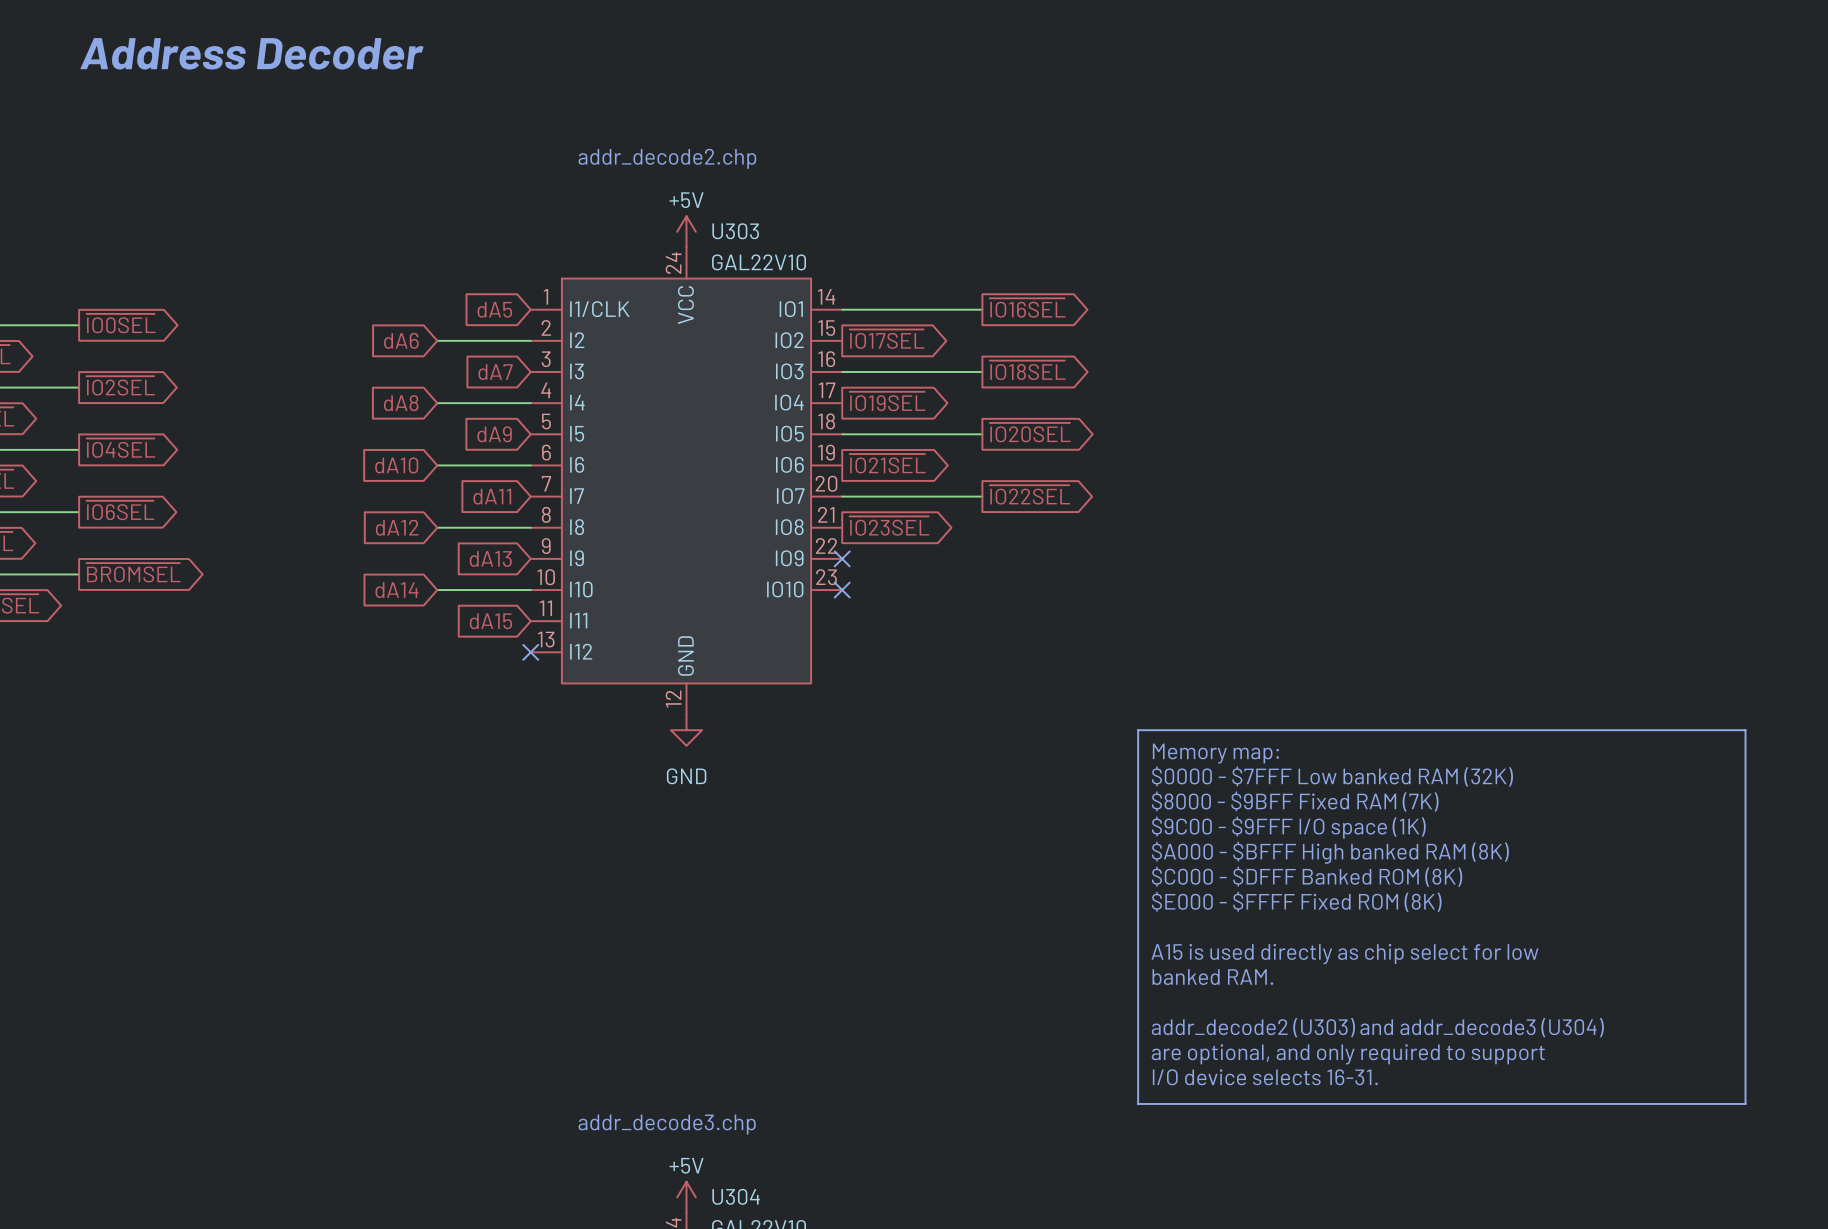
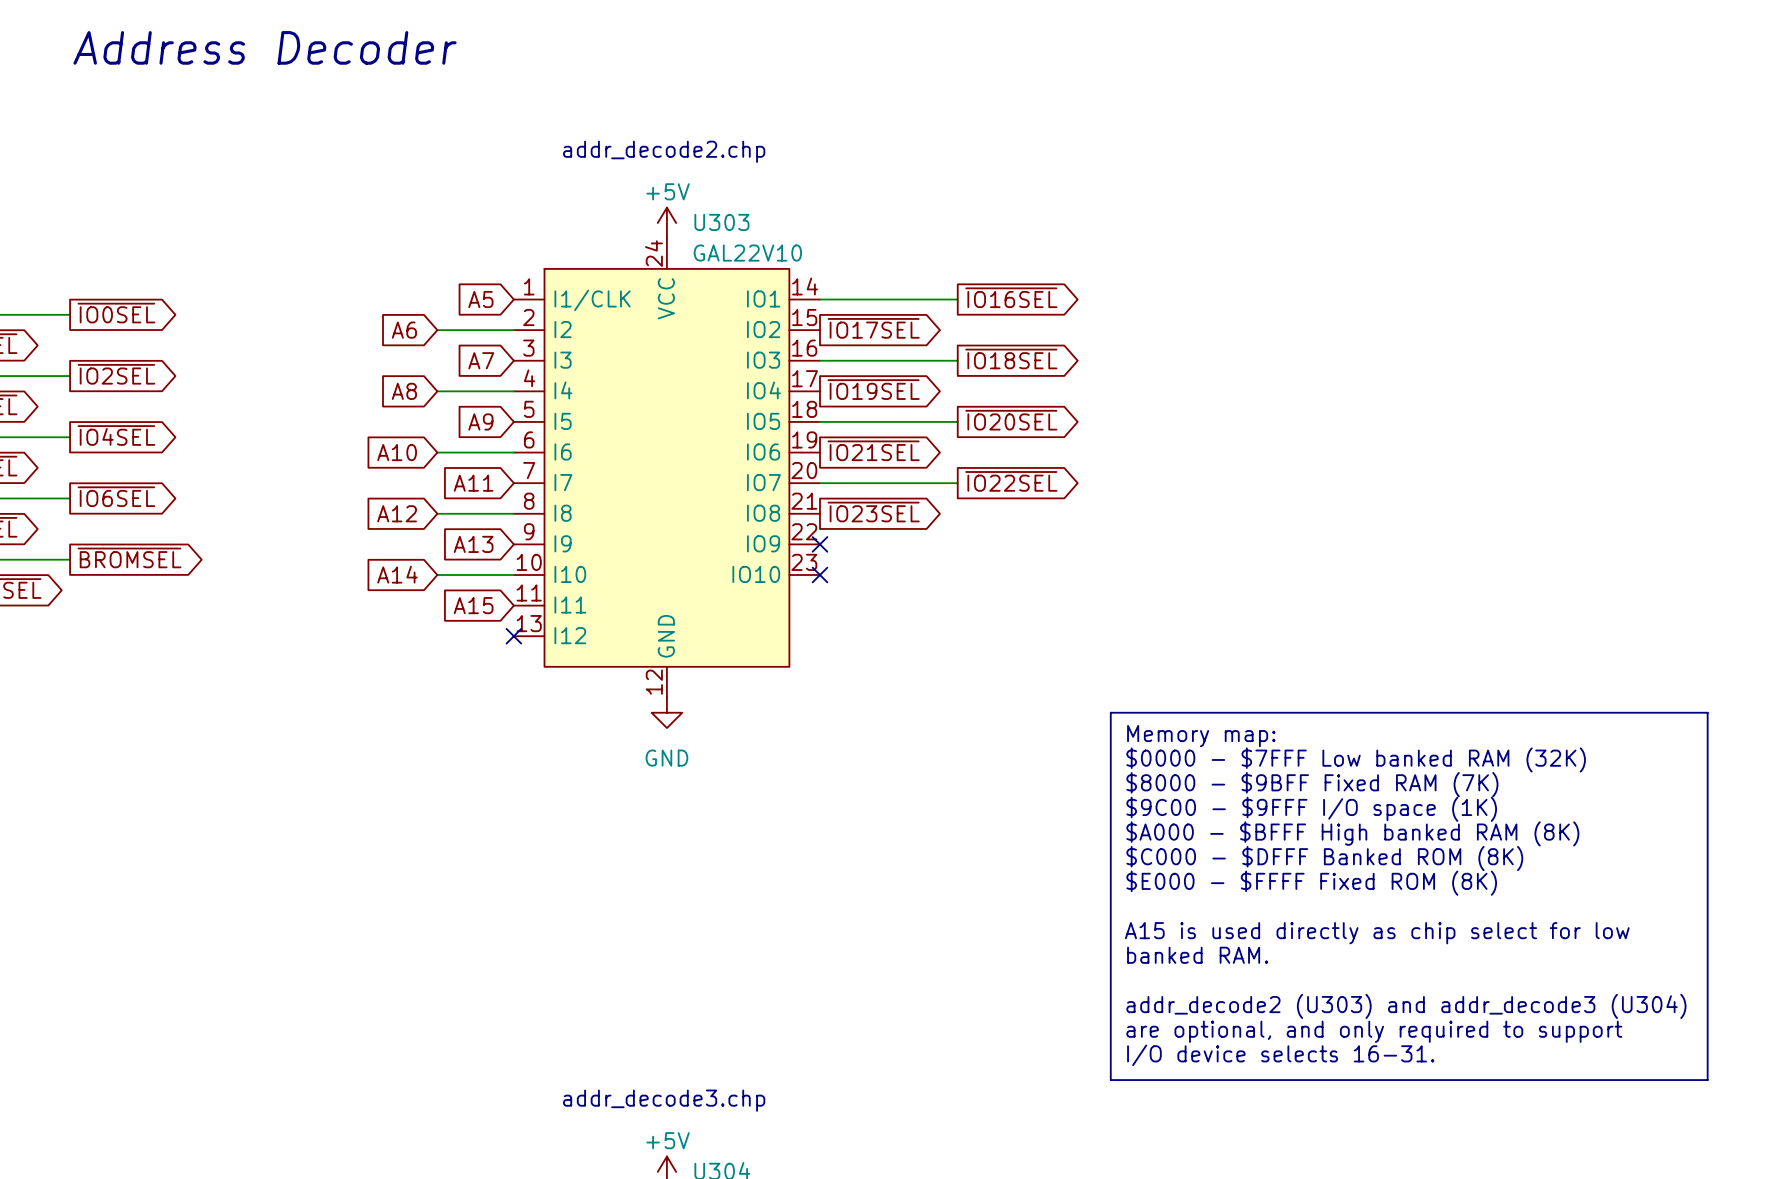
global label: dA5 (494, 309) -> A5 (480, 299)
global label: dA6 (401, 340) -> A6 (404, 330)
wire: (437, 340) (452, 340) -> none
global label: dA7 (495, 372) -> A7 (481, 360)
global label: dA8 (401, 403) -> A8 (404, 391)
wire: (437, 403) (452, 403) -> none
global label: dA9 (494, 434) -> A9 (480, 421)
global label: dA10 (396, 465) -> A10 (397, 452)
wire: (437, 465) (452, 465) -> none
global label: dA11 (492, 496) -> A11 (473, 483)
global label: dA12 (397, 527) -> A12 (397, 513)
wire: (437, 527) (452, 527) -> none
global label: dA13 (490, 558) -> A13 (473, 544)
global label: dA14 (396, 590) -> A14 (397, 574)
wire: (437, 590) (452, 590) -> none
global label: dA15 (490, 621) -> A15 (473, 605)

